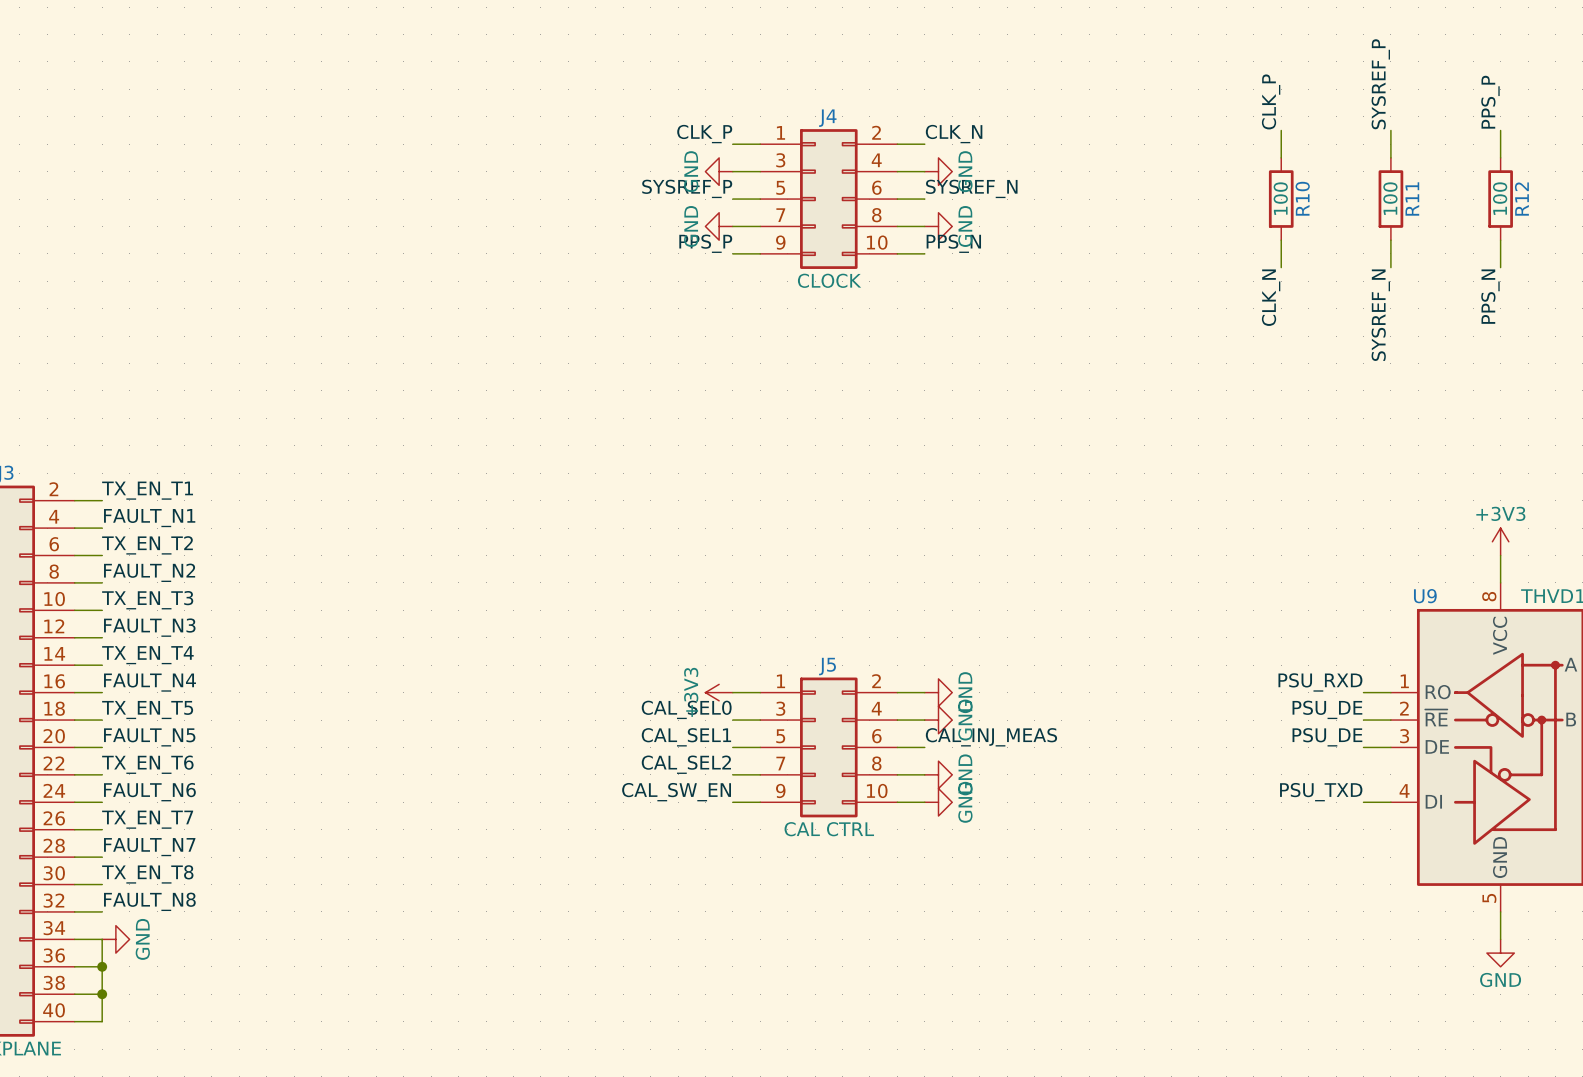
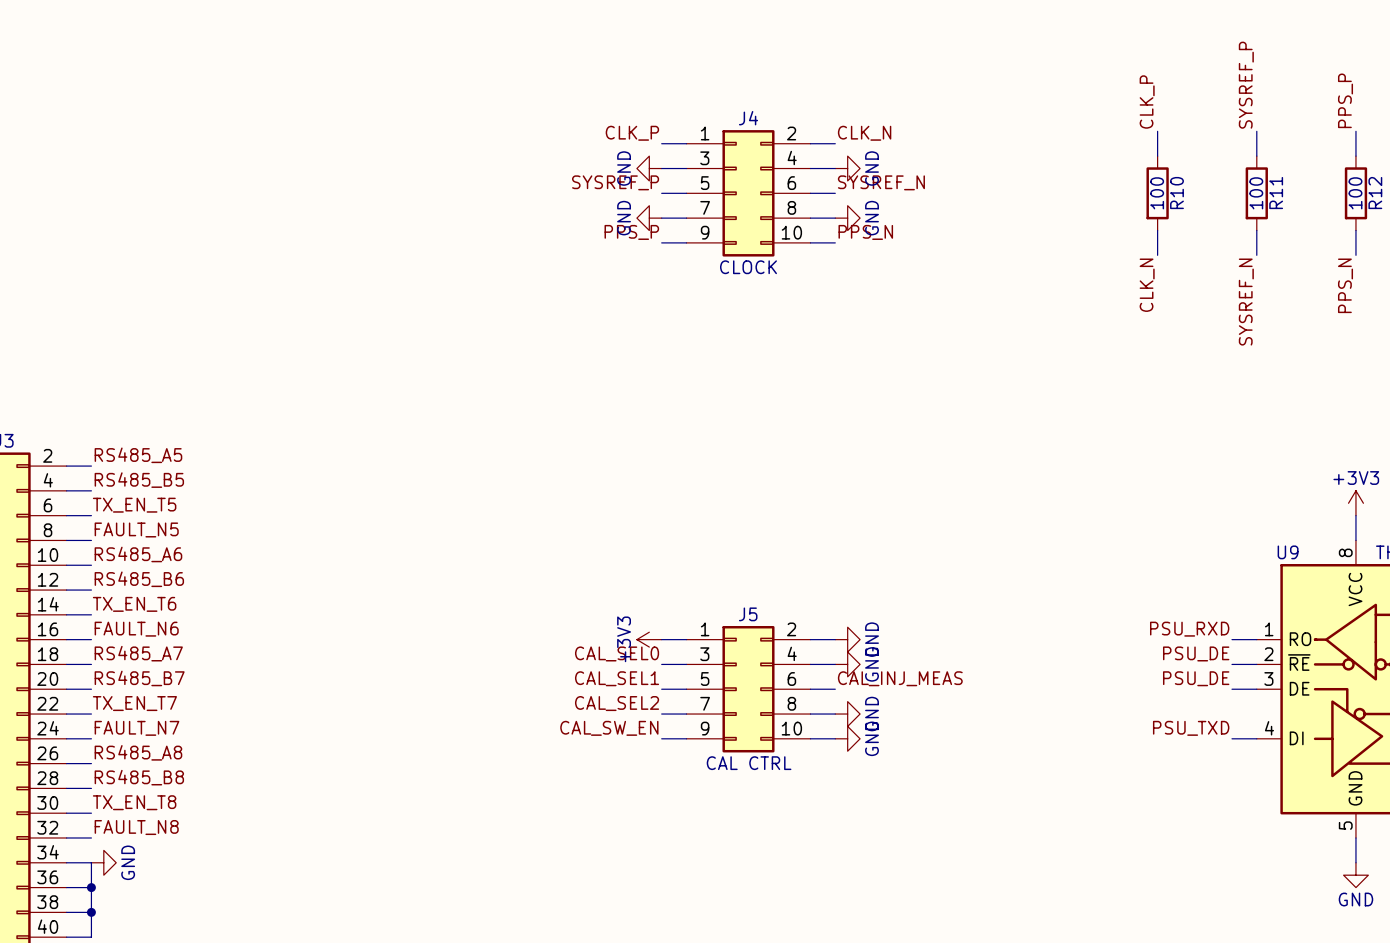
label: TX_EN_T1 (147, 490) -> RS485_A5 (138, 455)
label: FAULT_N1 (149, 518) -> RS485_B5 (139, 480)
label: TX_EN_T2 (147, 545) -> TX_EN_T5 (134, 505)
label: FAULT_N2 (149, 572) -> FAULT_N5 (136, 529)
label: TX_EN_T3 (147, 600) -> RS485_A6 (138, 554)
label: FAULT_N3 (149, 627) -> RS485_B6 (139, 579)
label: TX_EN_T4 (147, 655) -> TX_EN_T6 (134, 604)
label: FAULT_N4 (149, 682) -> FAULT_N6 (136, 629)
label: TX_EN_T5 (147, 710) -> RS485_A7 (138, 653)
label: FAULT_N5 (149, 737) -> RS485_B7 (139, 678)
label: TX_EN_T6 (147, 764) -> TX_EN_T7 (134, 703)
label: FAULT_N6 (149, 792) -> FAULT_N7 (136, 728)
label: TX_EN_T7 (147, 819) -> RS485_A8 (138, 752)
label: FAULT_N7 (149, 847) -> RS485_B8 (139, 777)

